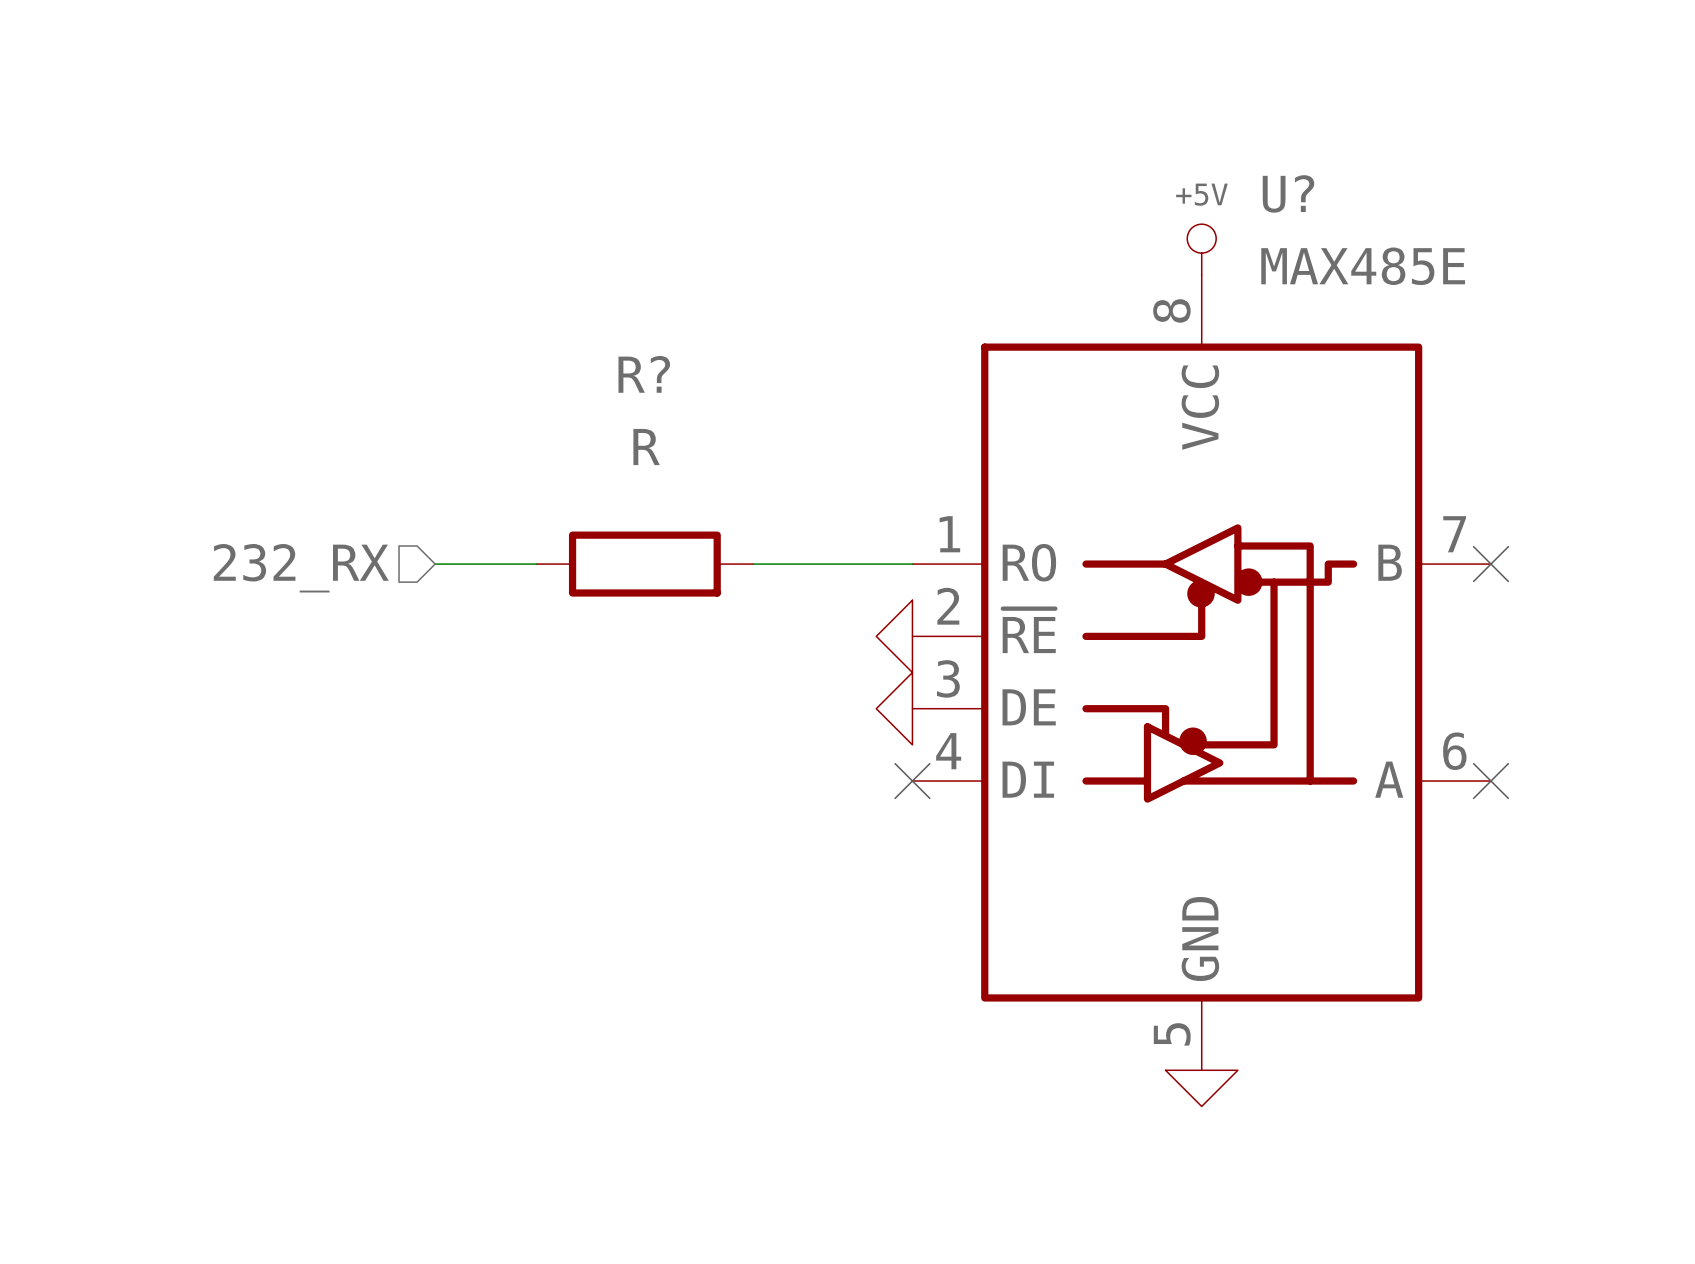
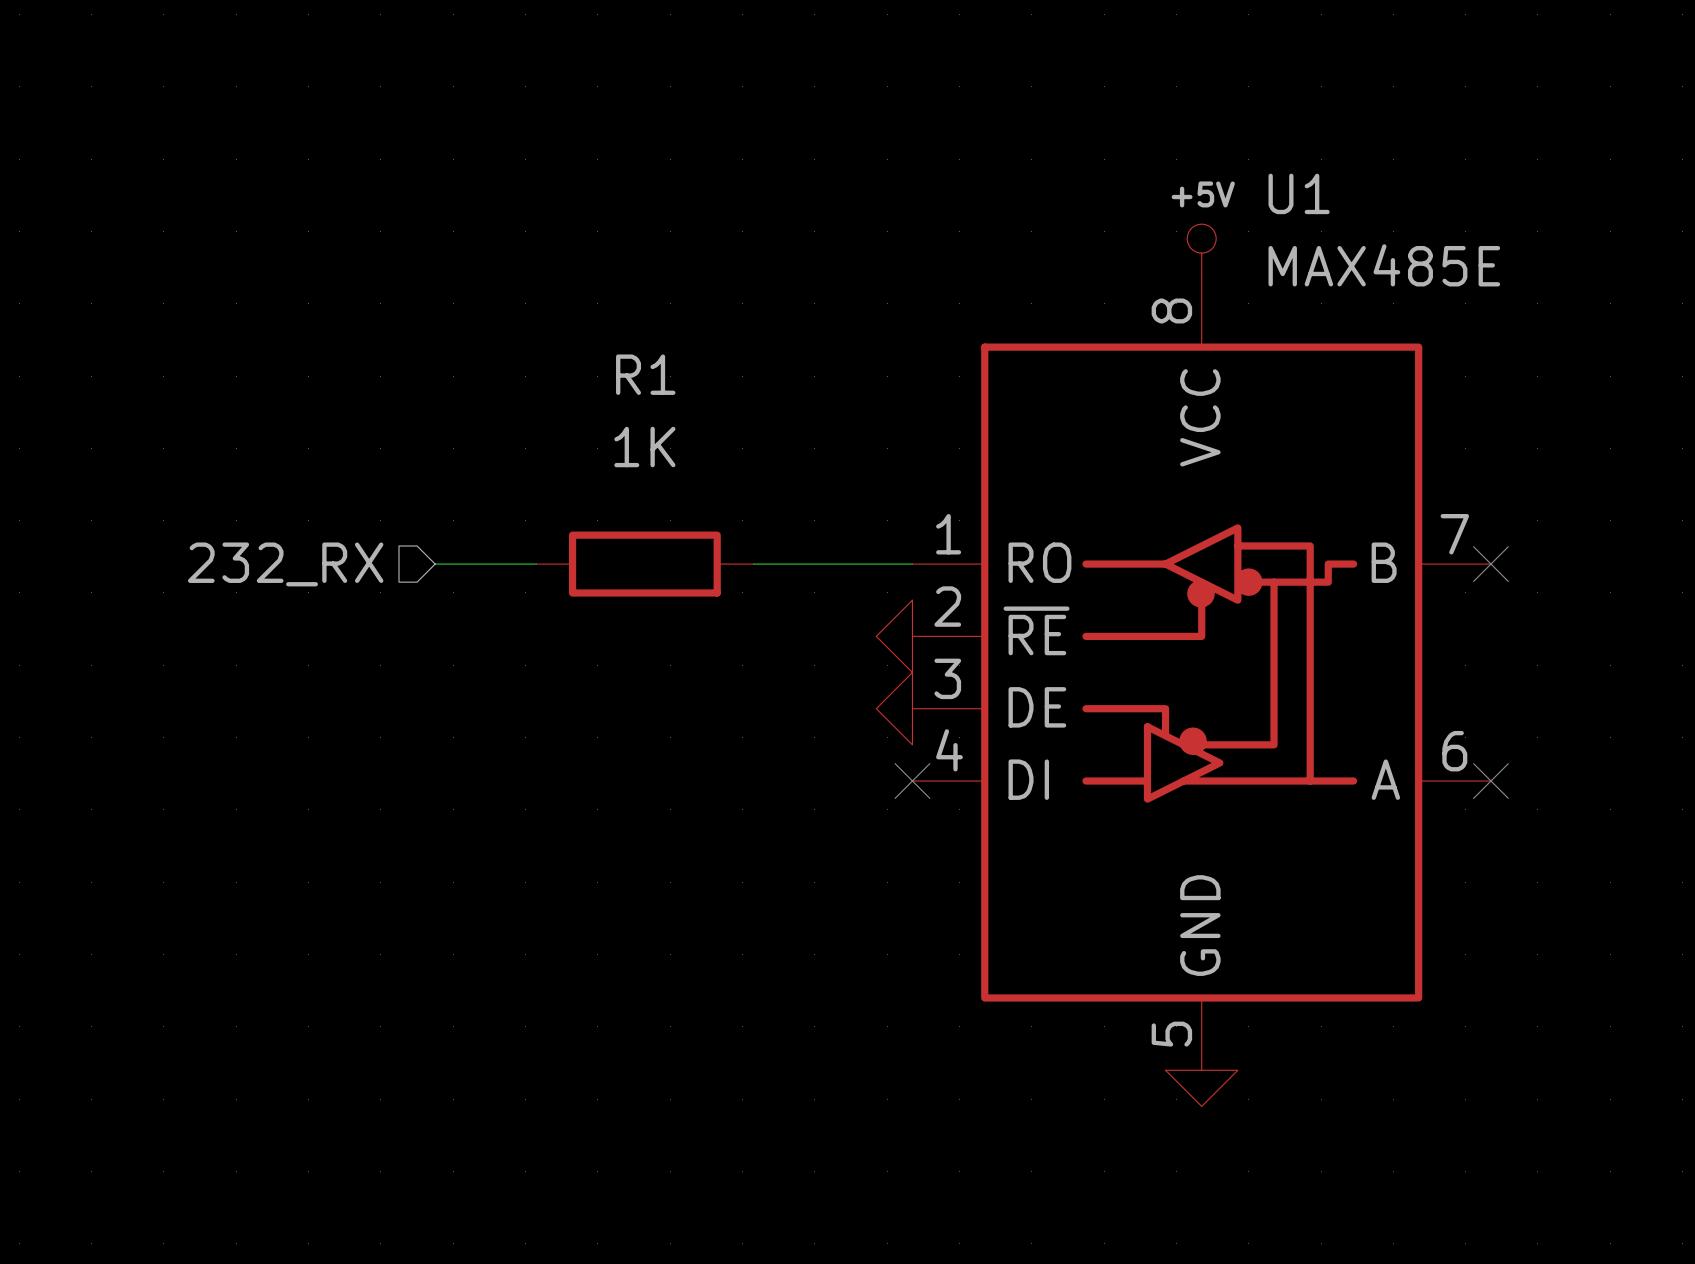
U? name: U? (1288, 193) -> U1 (1299, 193)
R? name: R? (644, 374) -> R1 (645, 374)
R? value: R (646, 447) -> 1K (644, 447)

